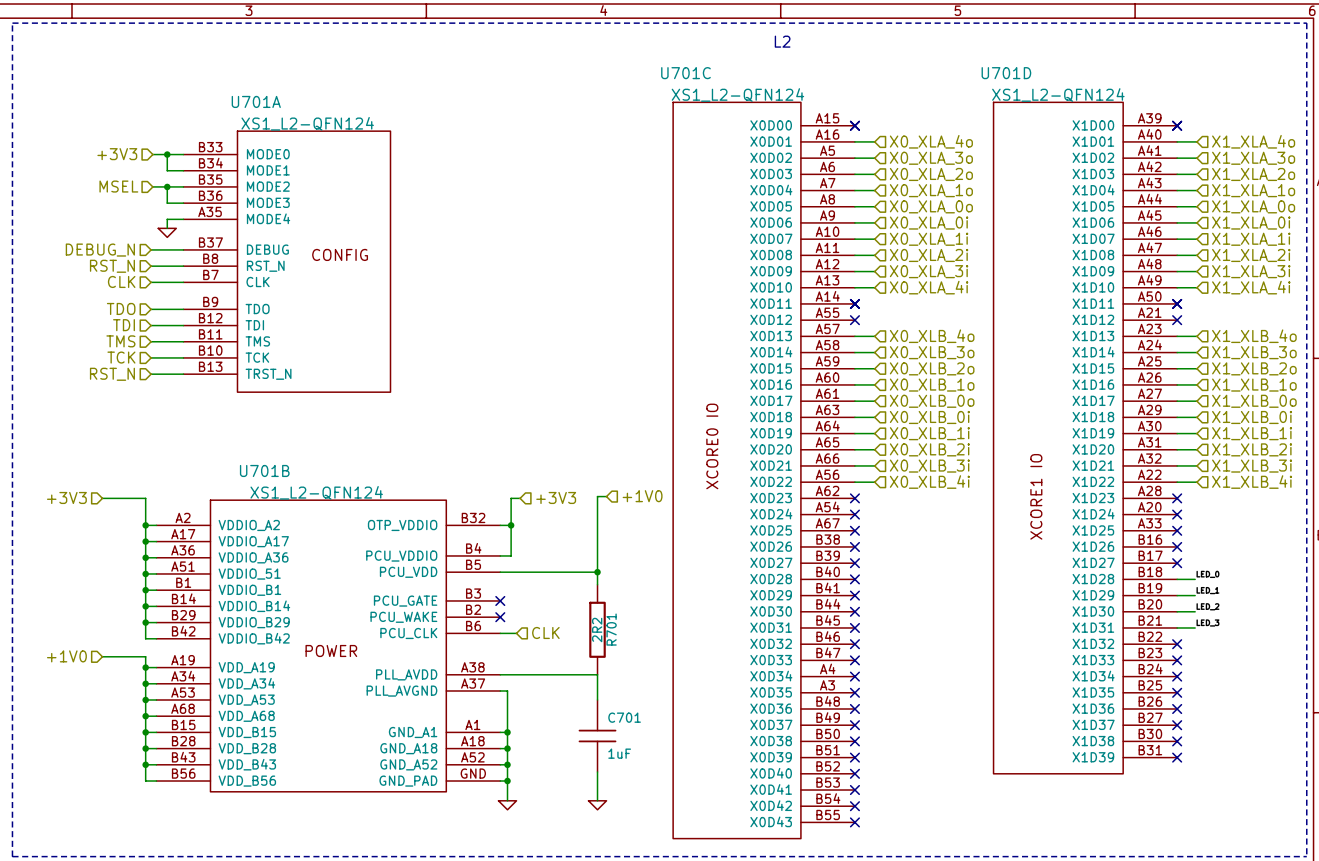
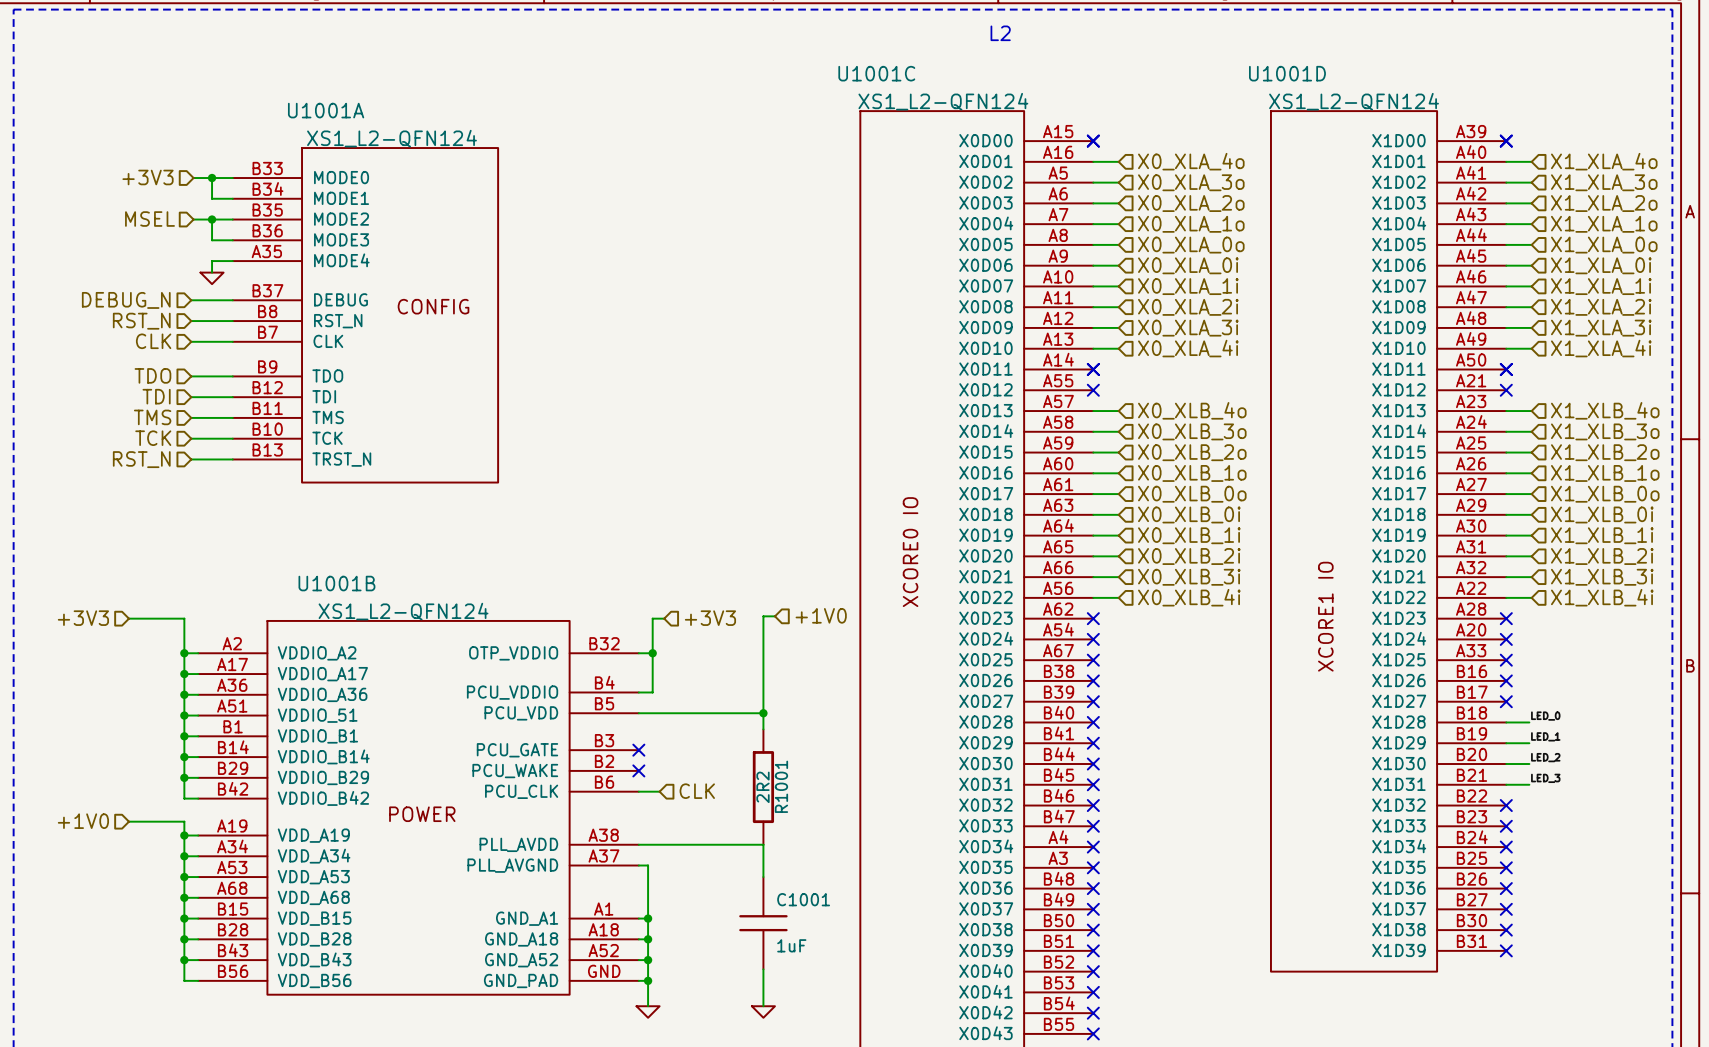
U701C name: U701C (685, 73) -> U1001C (876, 73)
U701D name: U701D (1006, 73) -> U1001D (1287, 73)
U701A name: U701A (256, 101) -> U1001A (326, 110)
U701B name: U701B (264, 470) -> U1001B (336, 583)
R701 name: R701 (611, 629) -> R1001 (781, 786)
C701 name: C701 (624, 717) -> C1001 (803, 899)

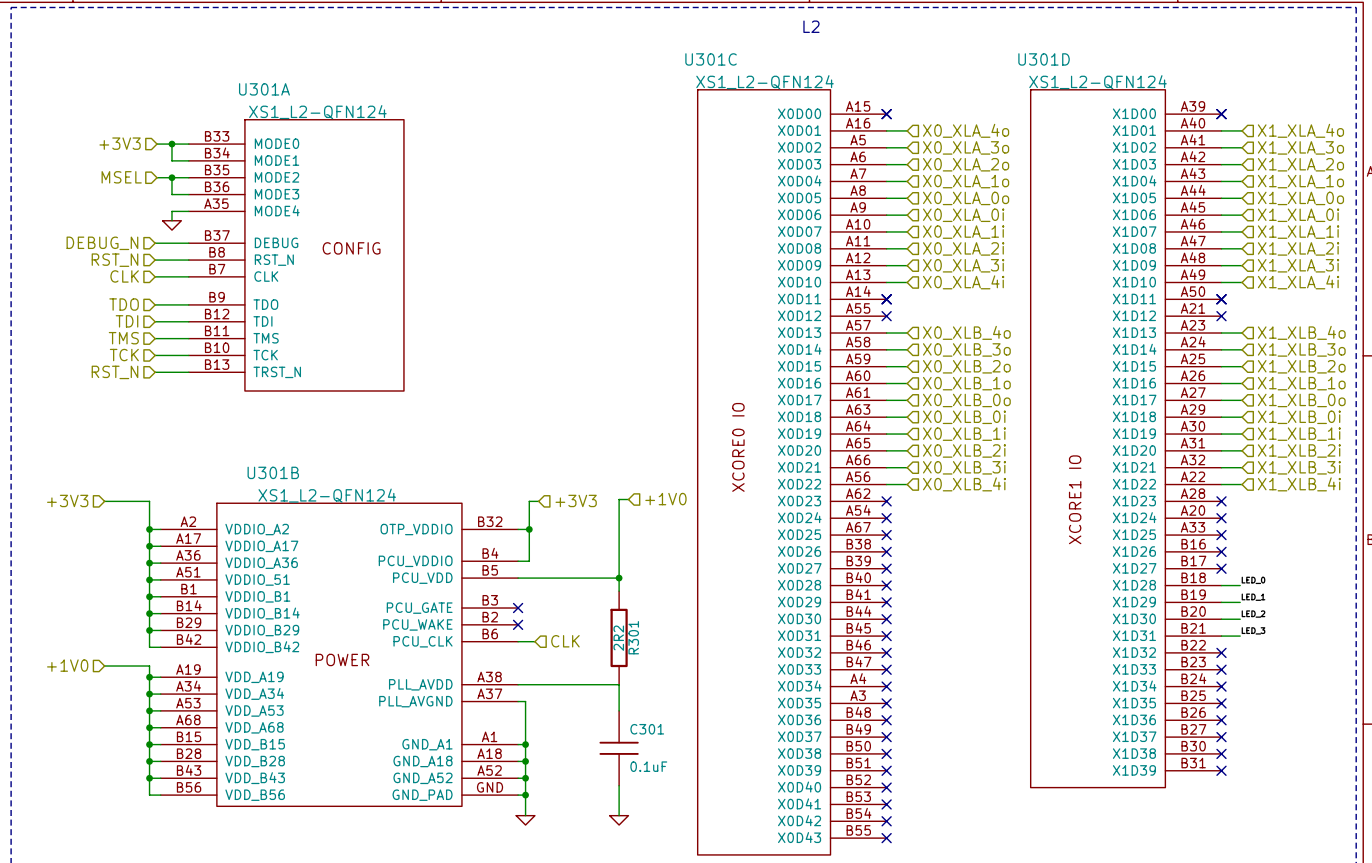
U1001C name: U1001C (876, 73) -> U301C (711, 59)
U1001D name: U1001D (1287, 73) -> U301D (1044, 59)
U1001A name: U1001A (326, 110) -> U301A (264, 89)
U1001B name: U1001B (336, 583) -> U301B (273, 472)
R1001 name: R1001 (781, 786) -> R301 (633, 637)
C1001 name: C1001 (803, 899) -> C301 (647, 729)
C1001 value: 1uF (791, 945) -> 0.1uF (648, 766)

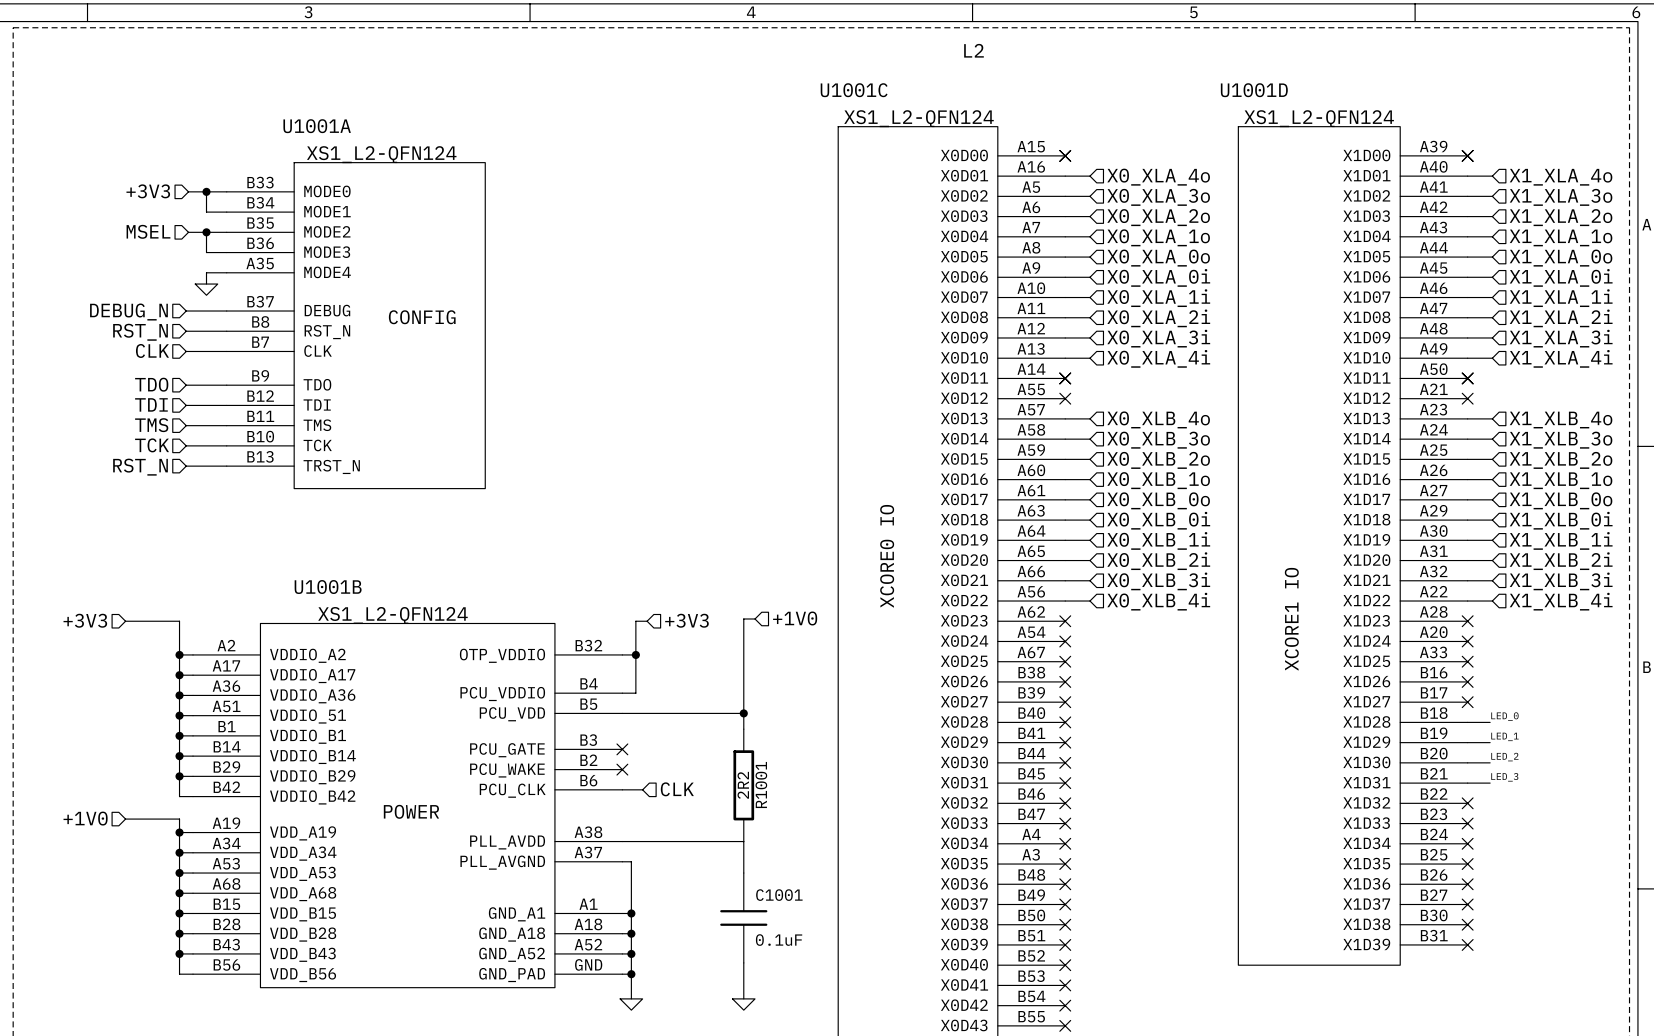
U301C name: U301C (711, 59) -> U1001C (854, 90)
U301D name: U301D (1044, 59) -> U1001D (1254, 90)
U301A name: U301A (264, 89) -> U1001A (317, 126)
U301B name: U301B (273, 472) -> U1001B (328, 587)
R301 name: R301 (633, 637) -> R1001 (761, 785)
C301 name: C301 (647, 729) -> C1001 (779, 895)

